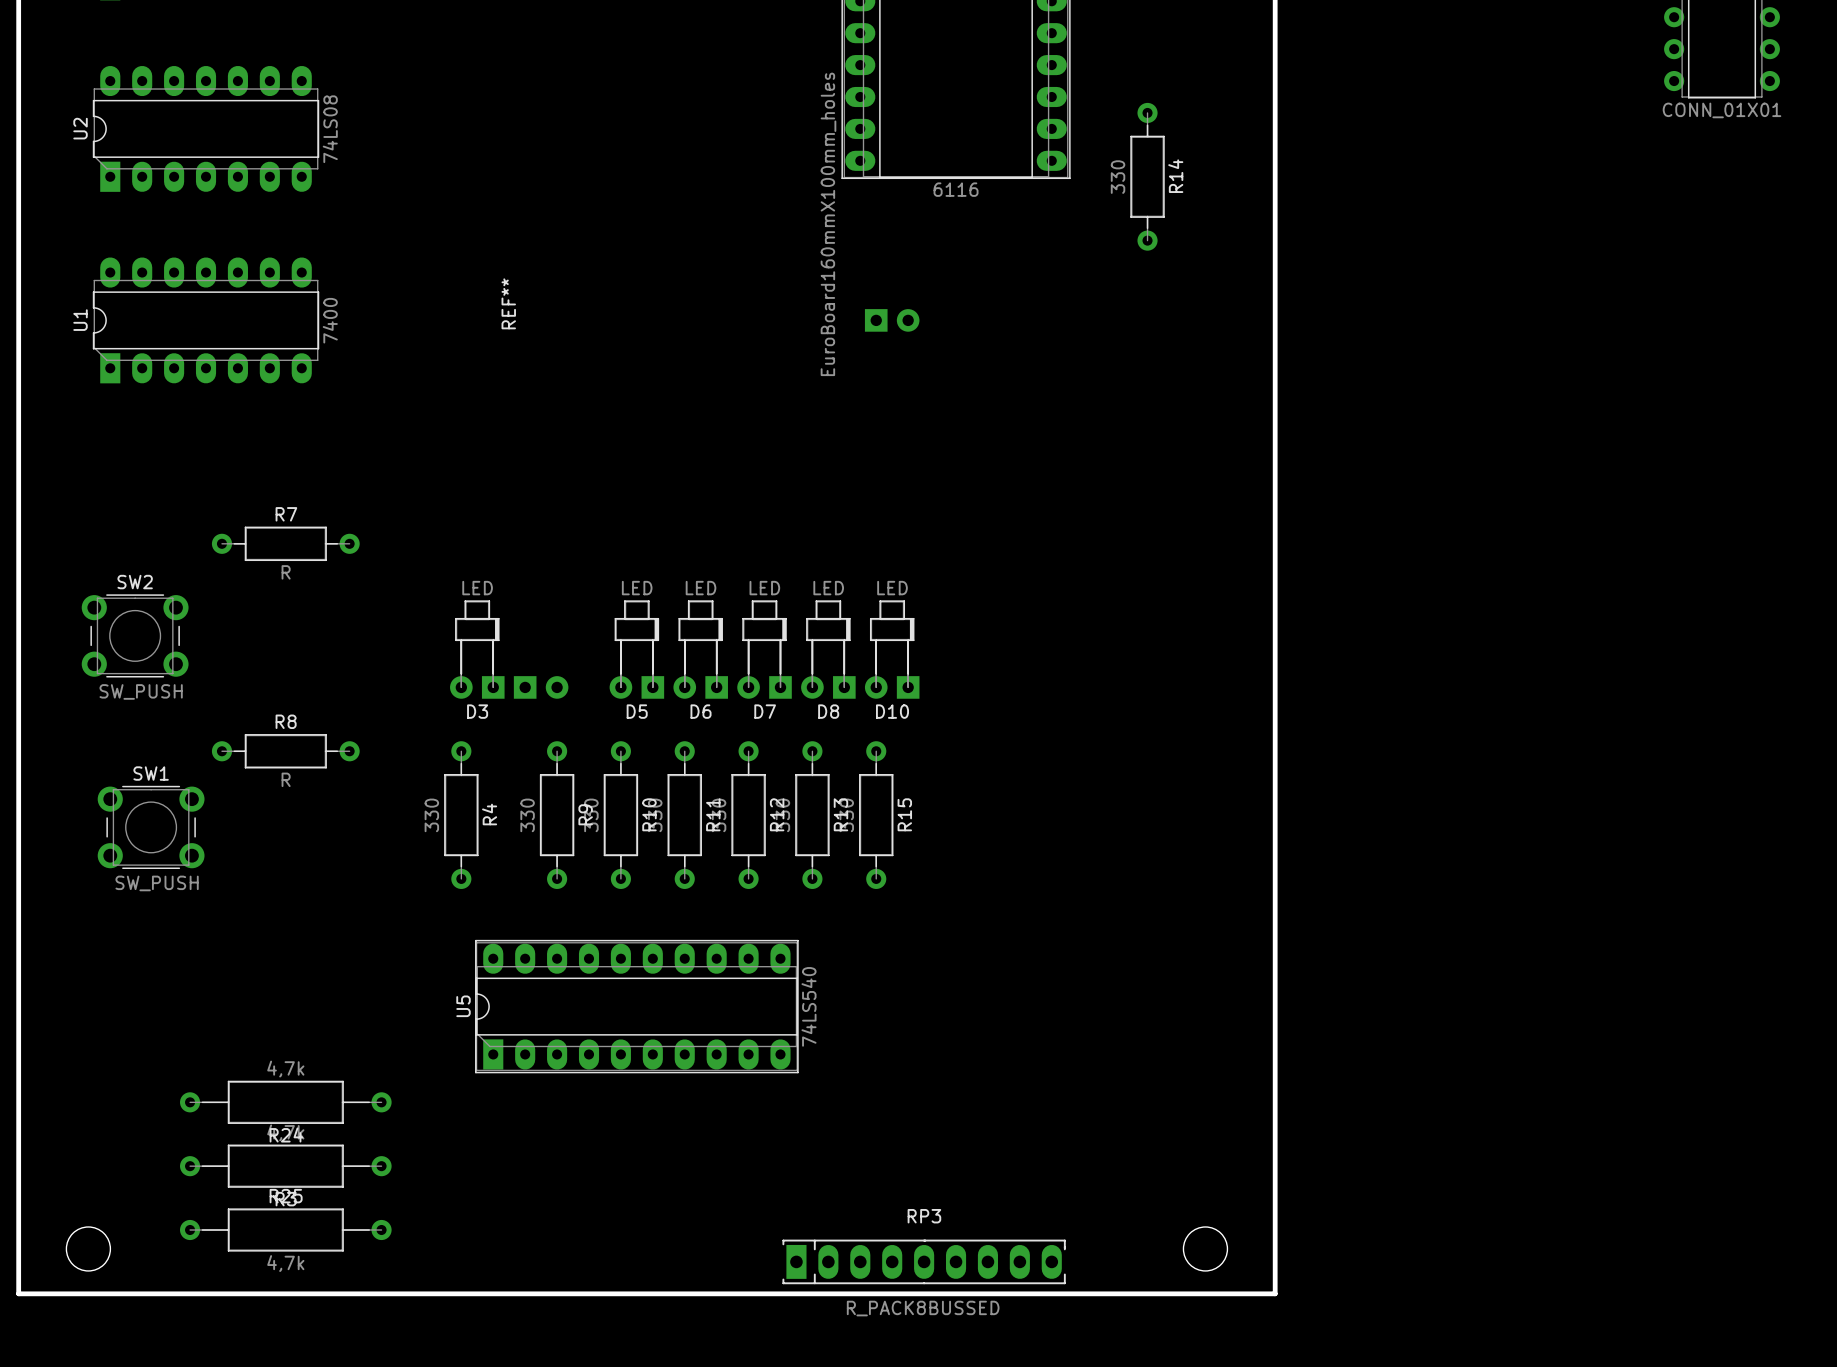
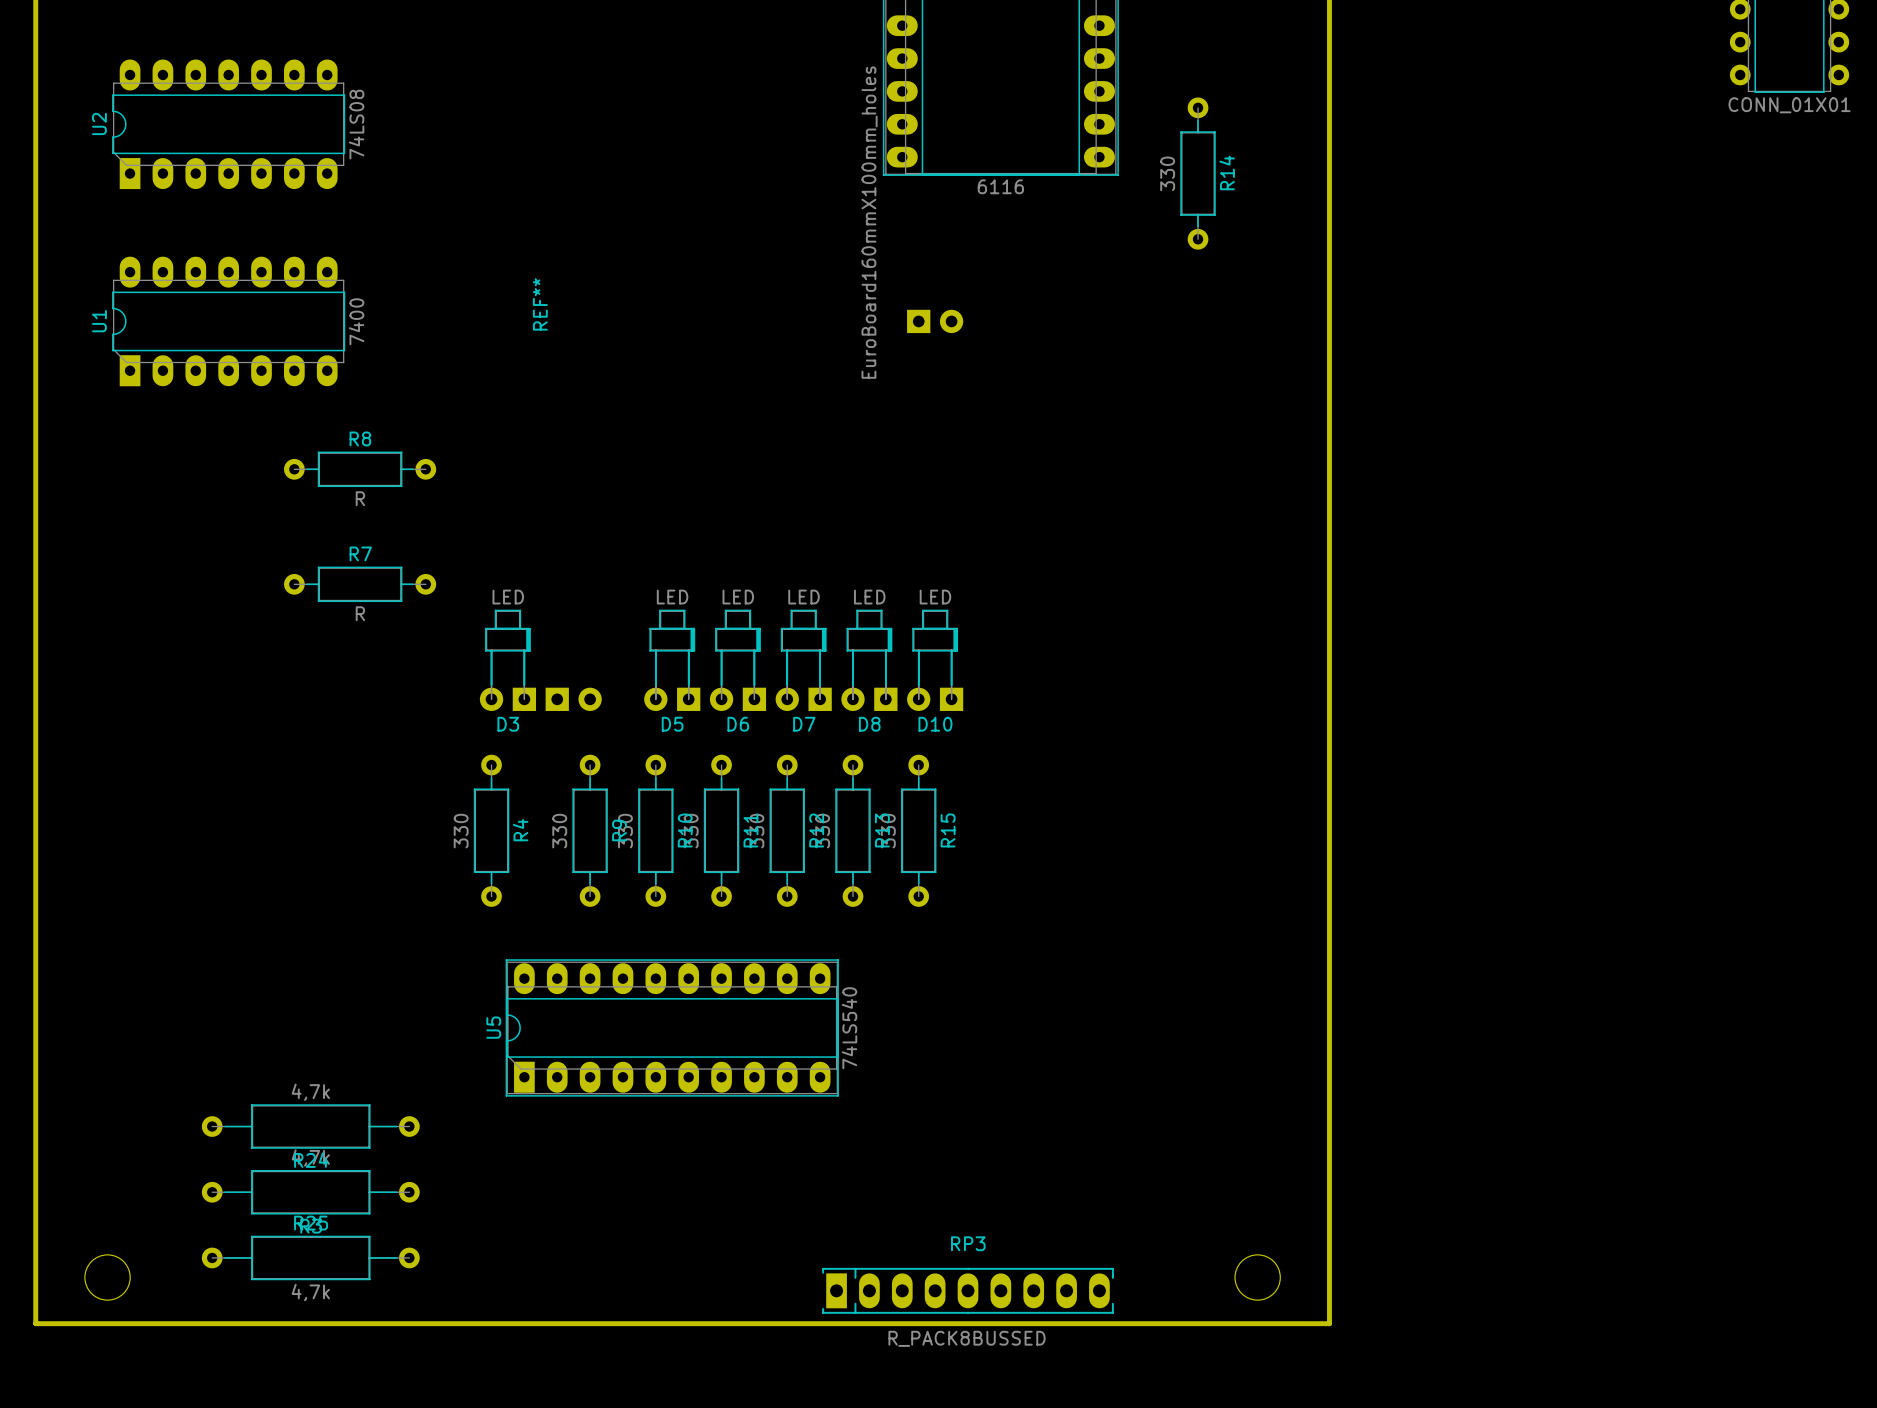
R7 position: (285, 543) -> (360, 584)
SW2: SW_PUSH (135, 635) -> none
R8 position: (285, 751) -> (360, 469)
SW1: SW_PUSH (151, 827) -> none

